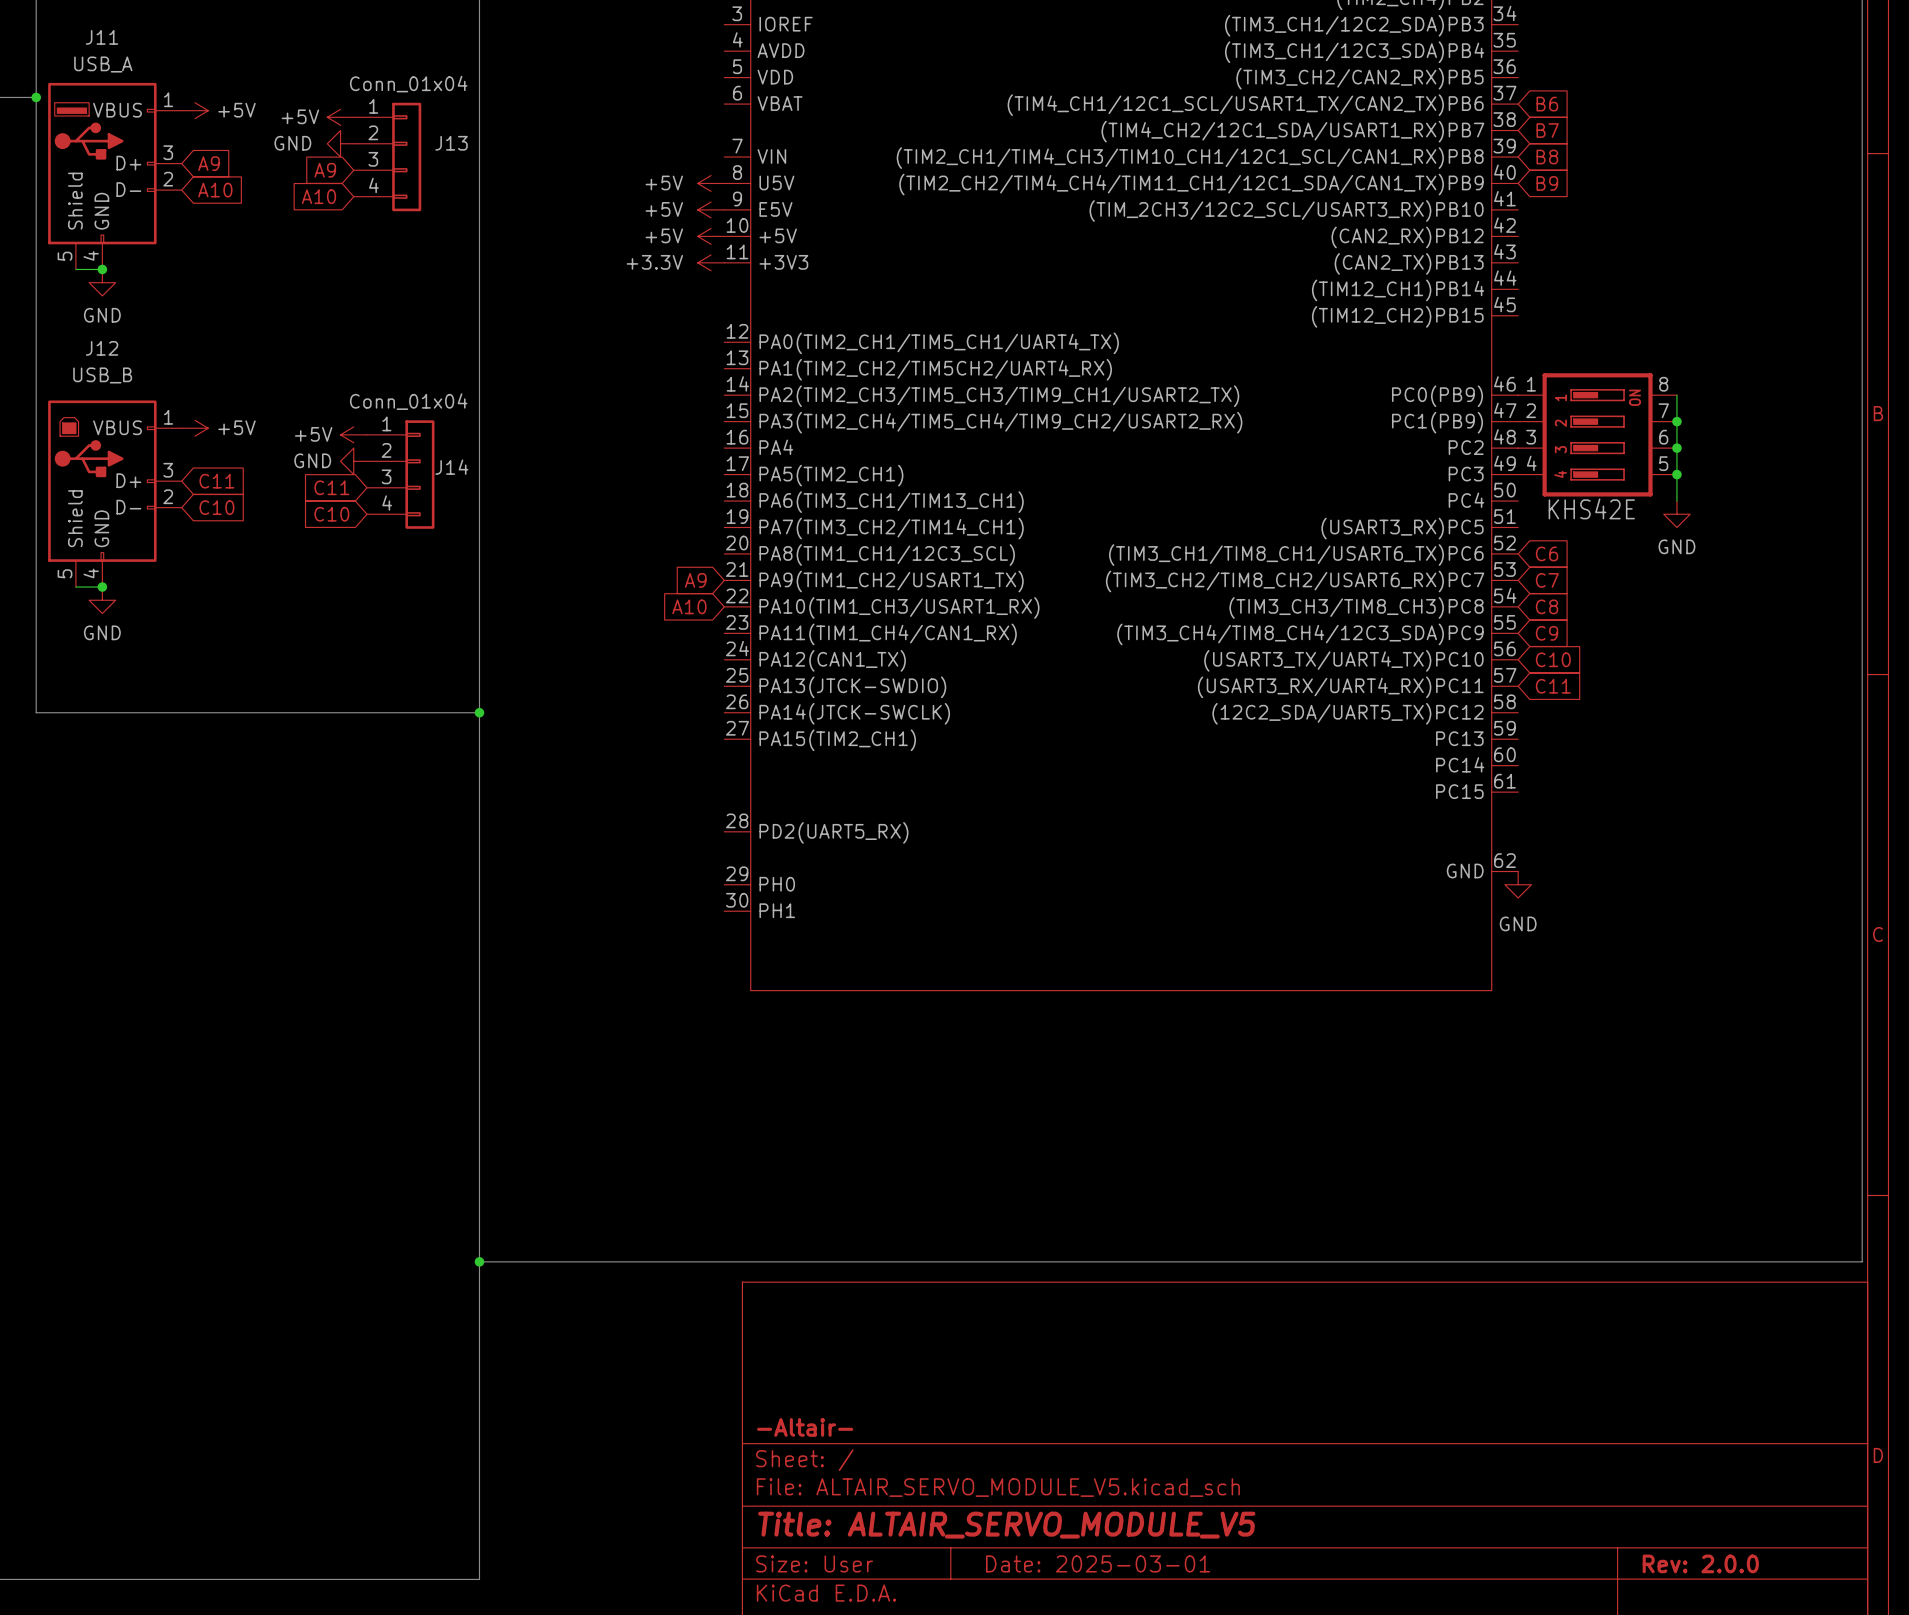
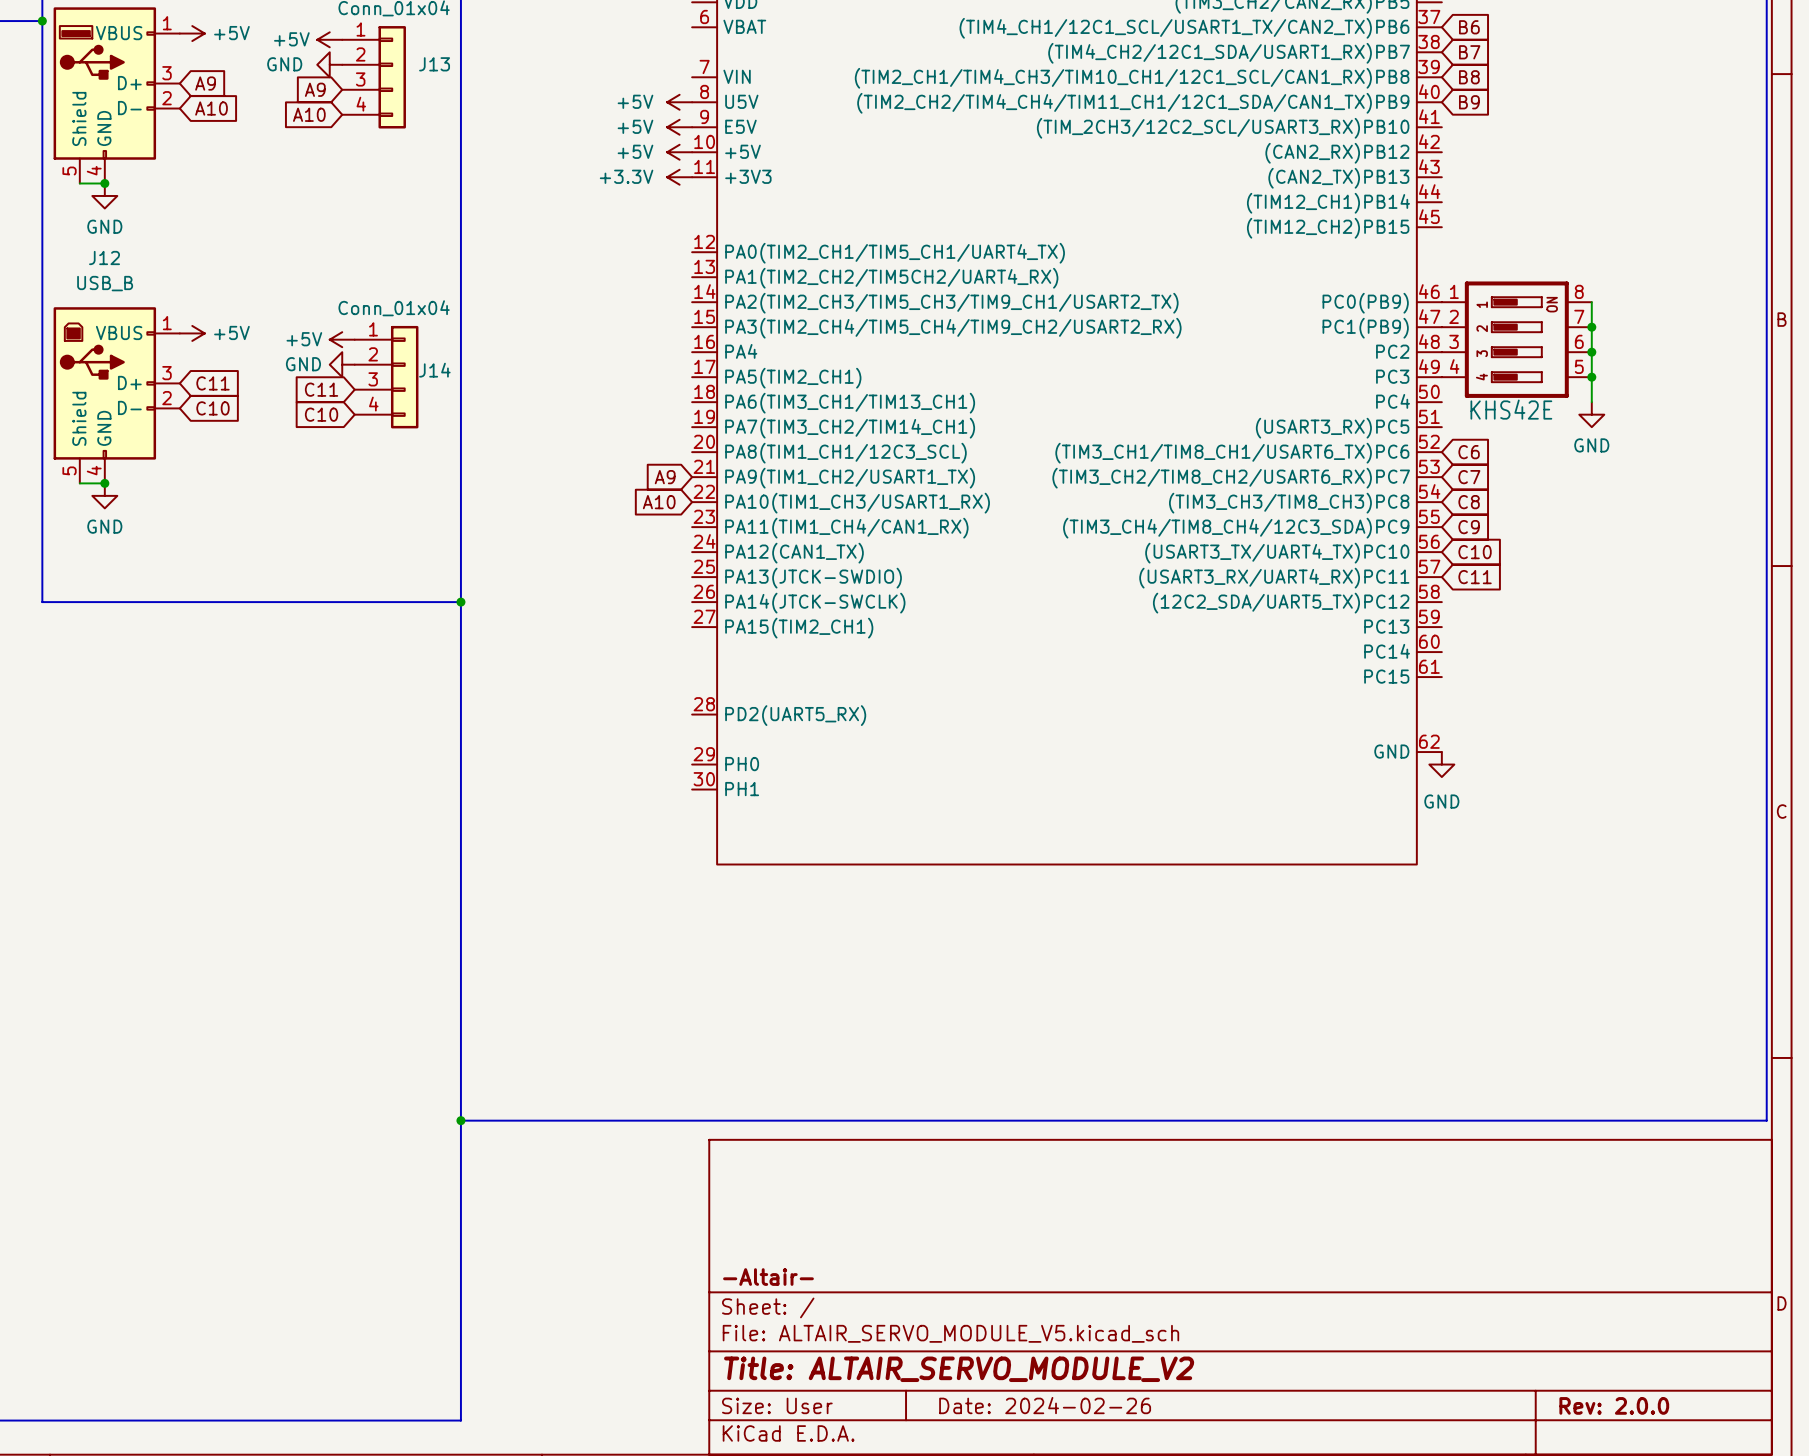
title block: Title: ALTAIR_SERVO_MODULE_V5 (1006, 1525) -> Title: ALTAIR_SERVO_MODULE_V2 (959, 1369)
title block: Date: 2025-03-01 (1098, 1563) -> Date: 2024-02-26 (1045, 1405)

